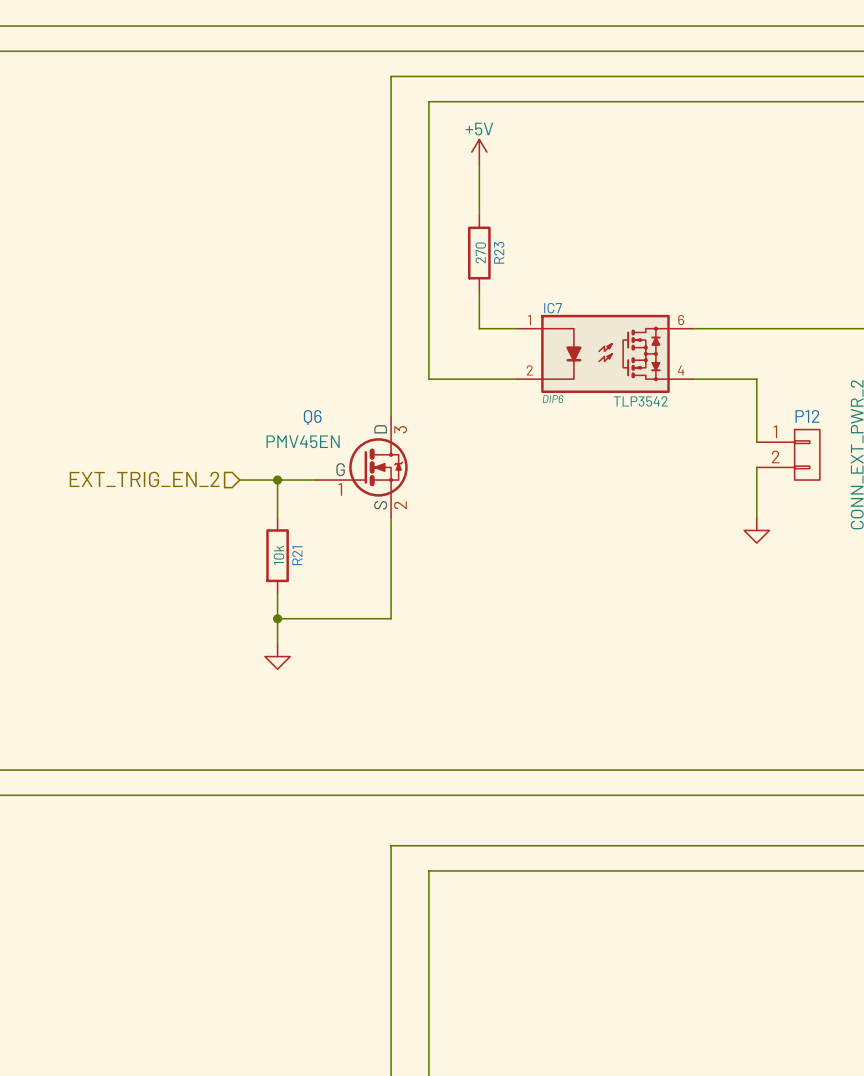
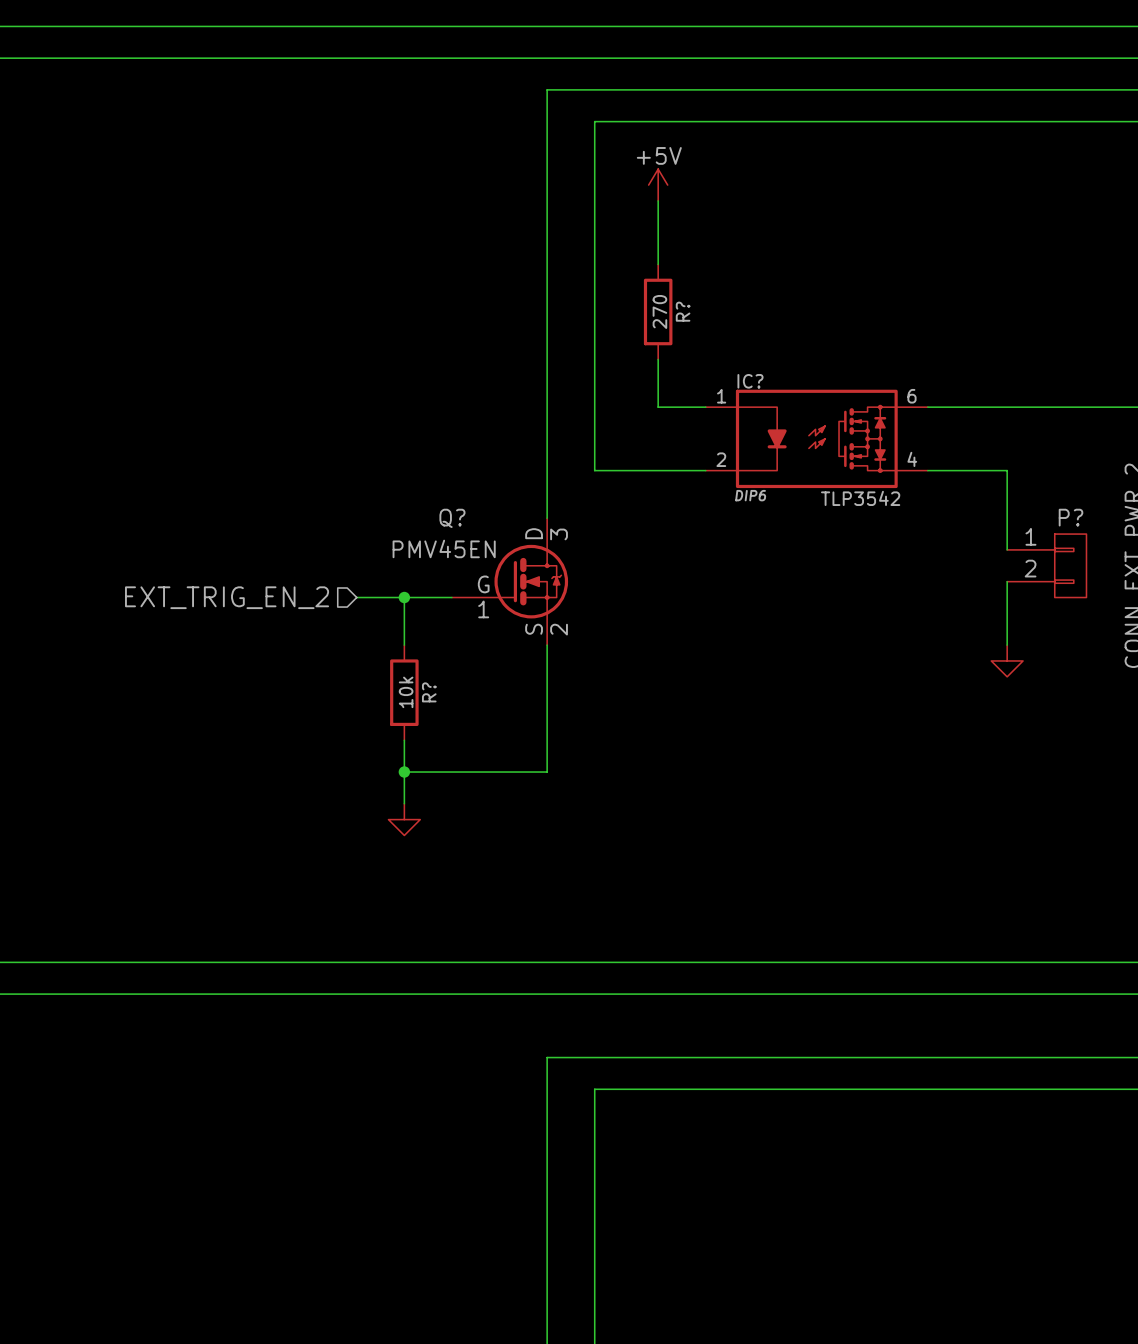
R23 name: R23 (499, 252) -> R? (683, 311)
IC7 name: IC7 (553, 308) -> IC? (750, 381)
P12 name: P12 (807, 416) -> P? (1071, 517)
Q6 name: Q6 (312, 417) -> Q? (452, 518)
R21 name: R21 (297, 555) -> R? (429, 692)

